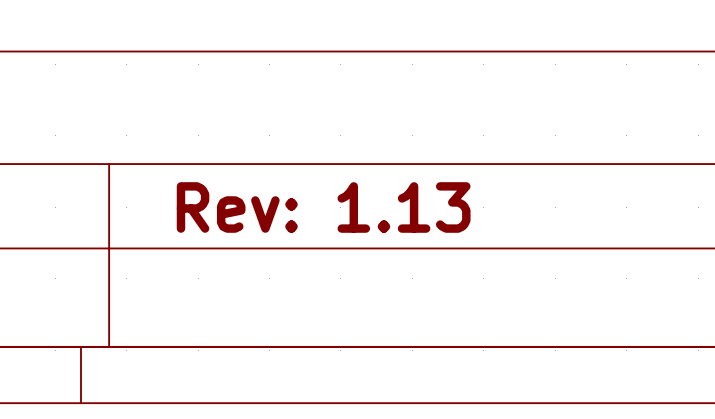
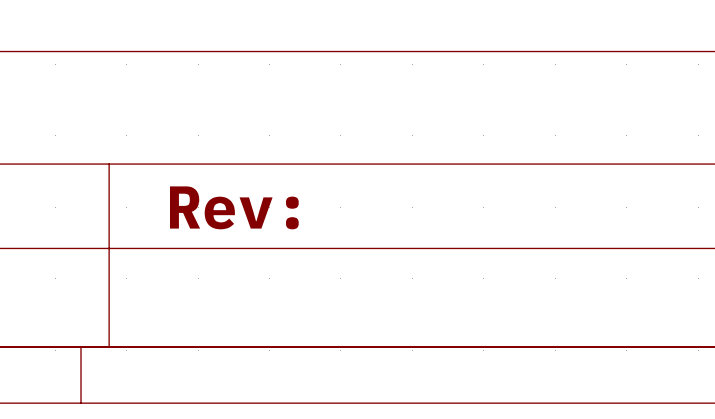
title block: Rev: 1.13 (323, 207) -> Rev: (234, 207)

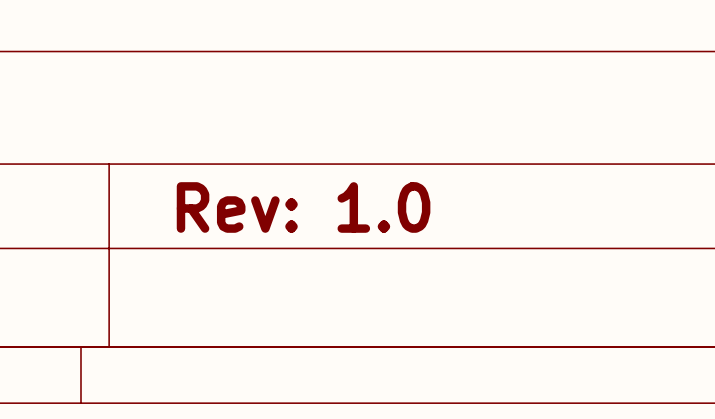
title block: Rev: (234, 207) -> Rev: 1.0 (303, 207)

